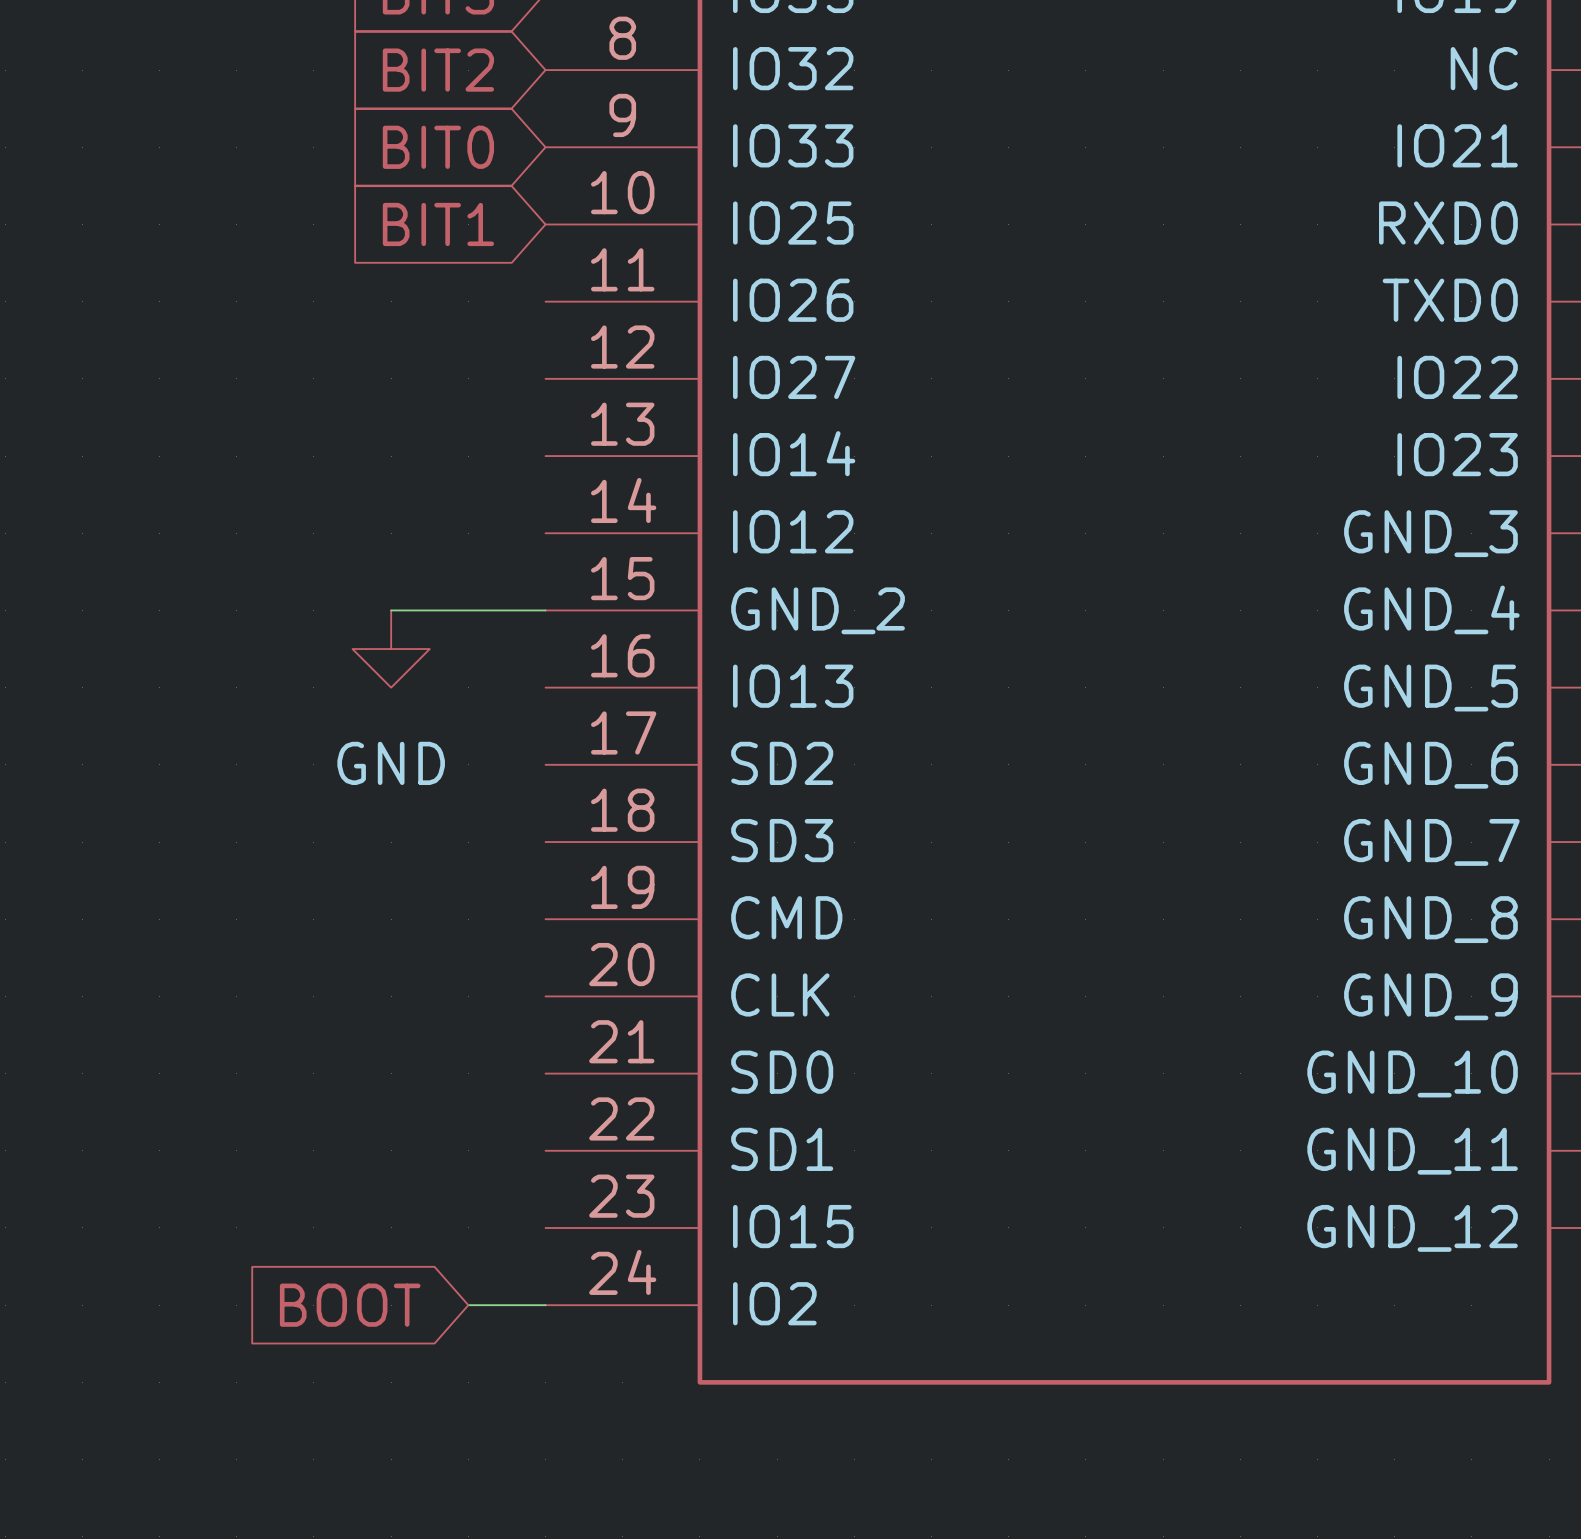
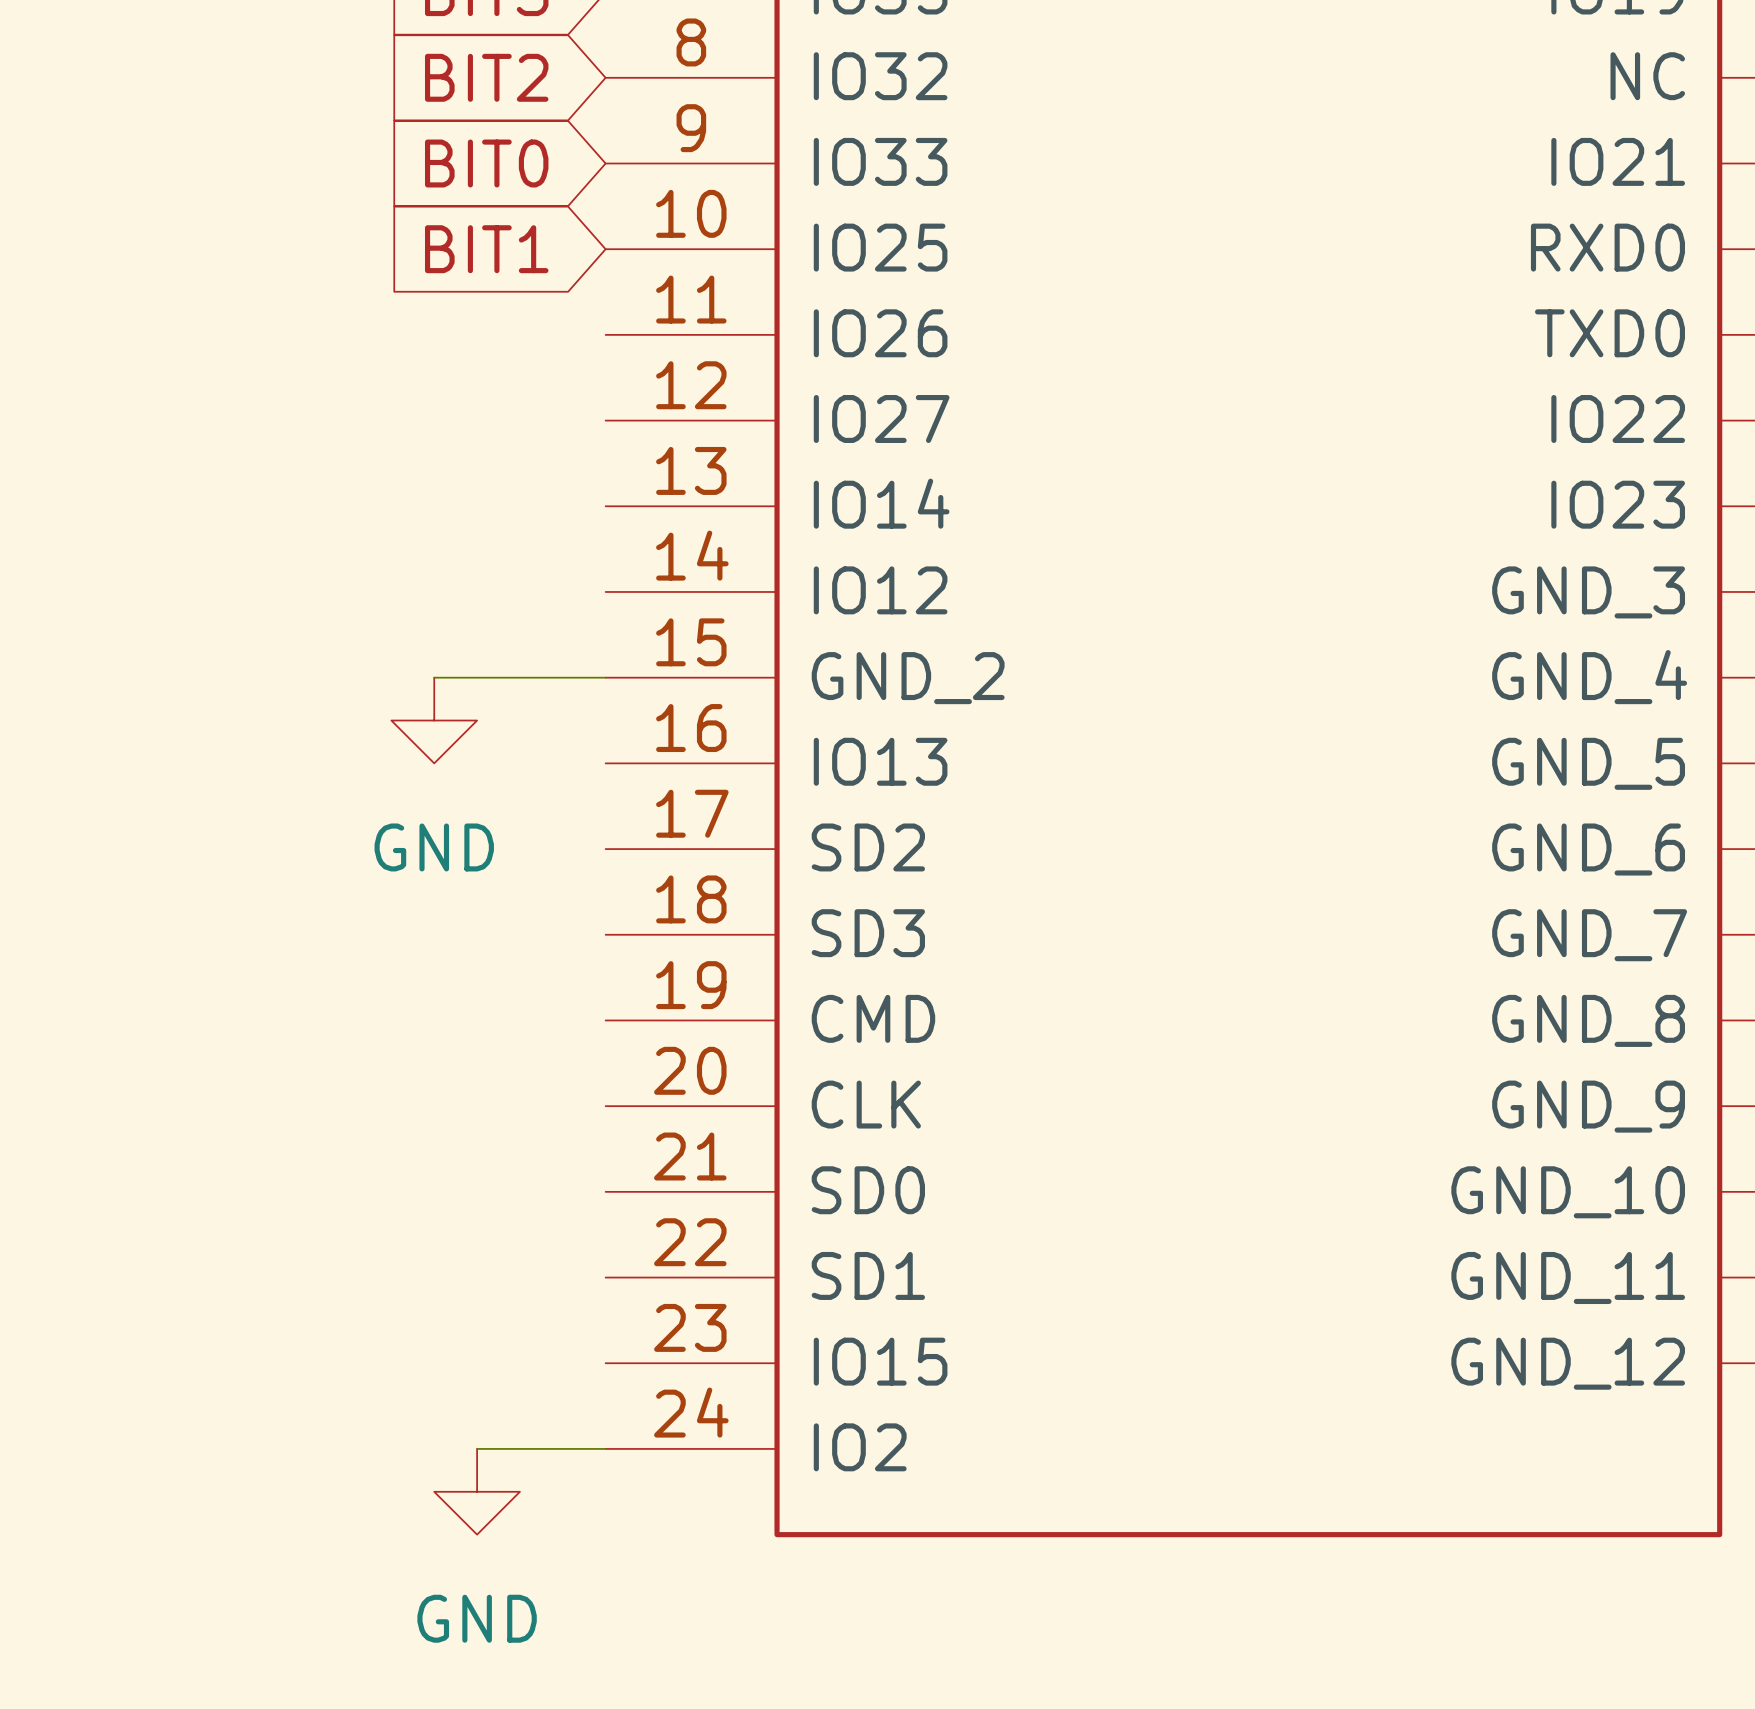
global label: BOOT (350, 1305) -> none
wire: none -> (477, 1448) (519, 1448)
power symbol: none -> GND (477, 1491)

